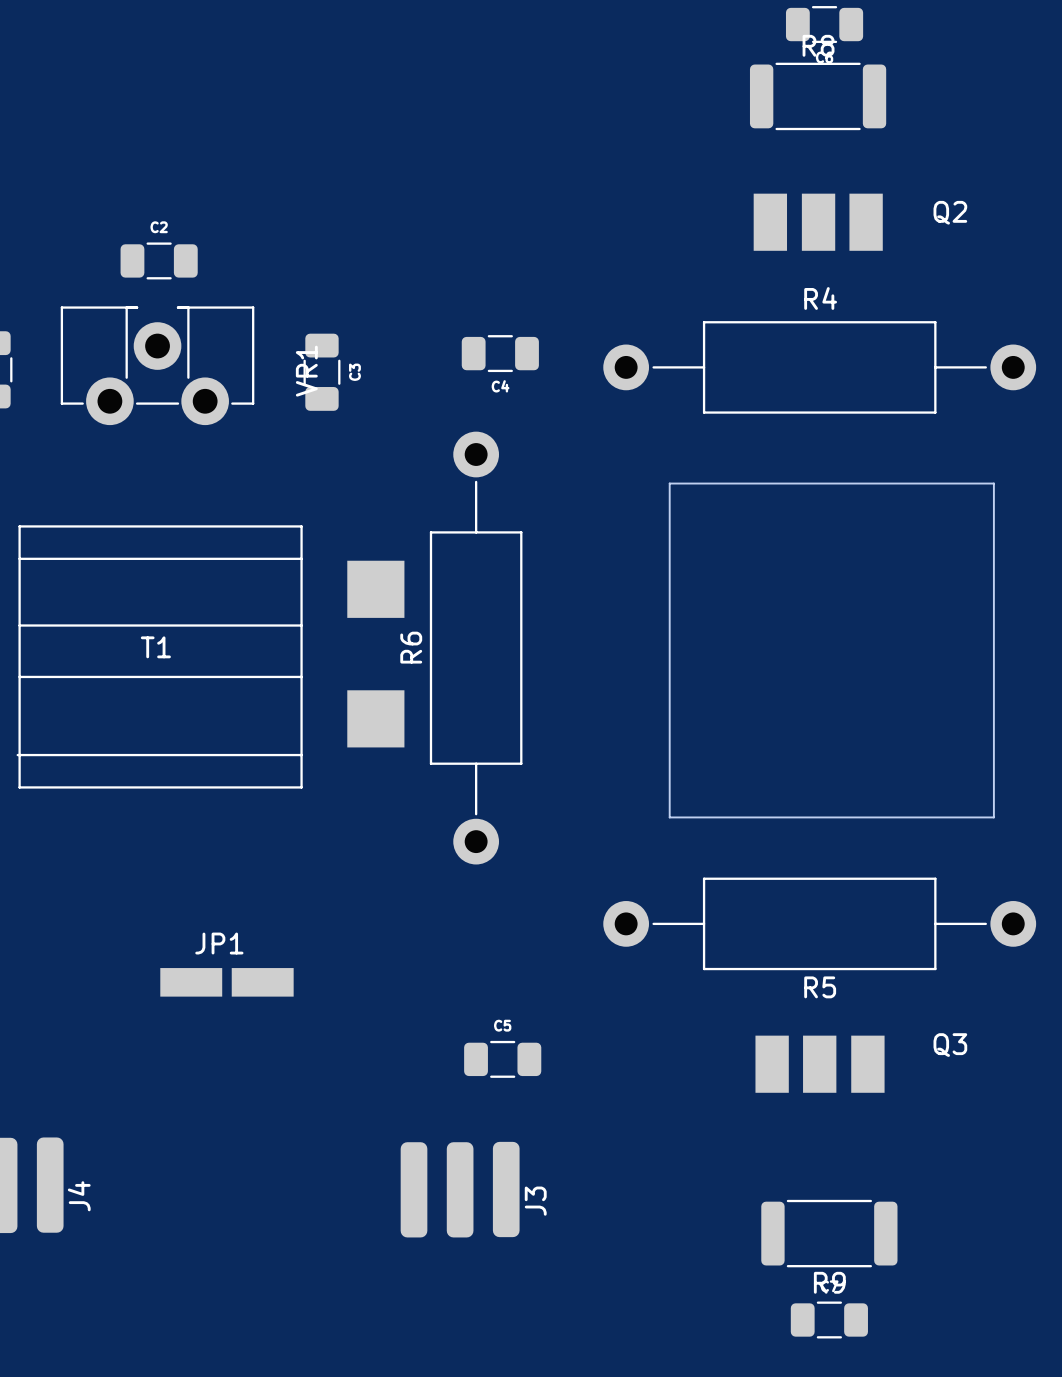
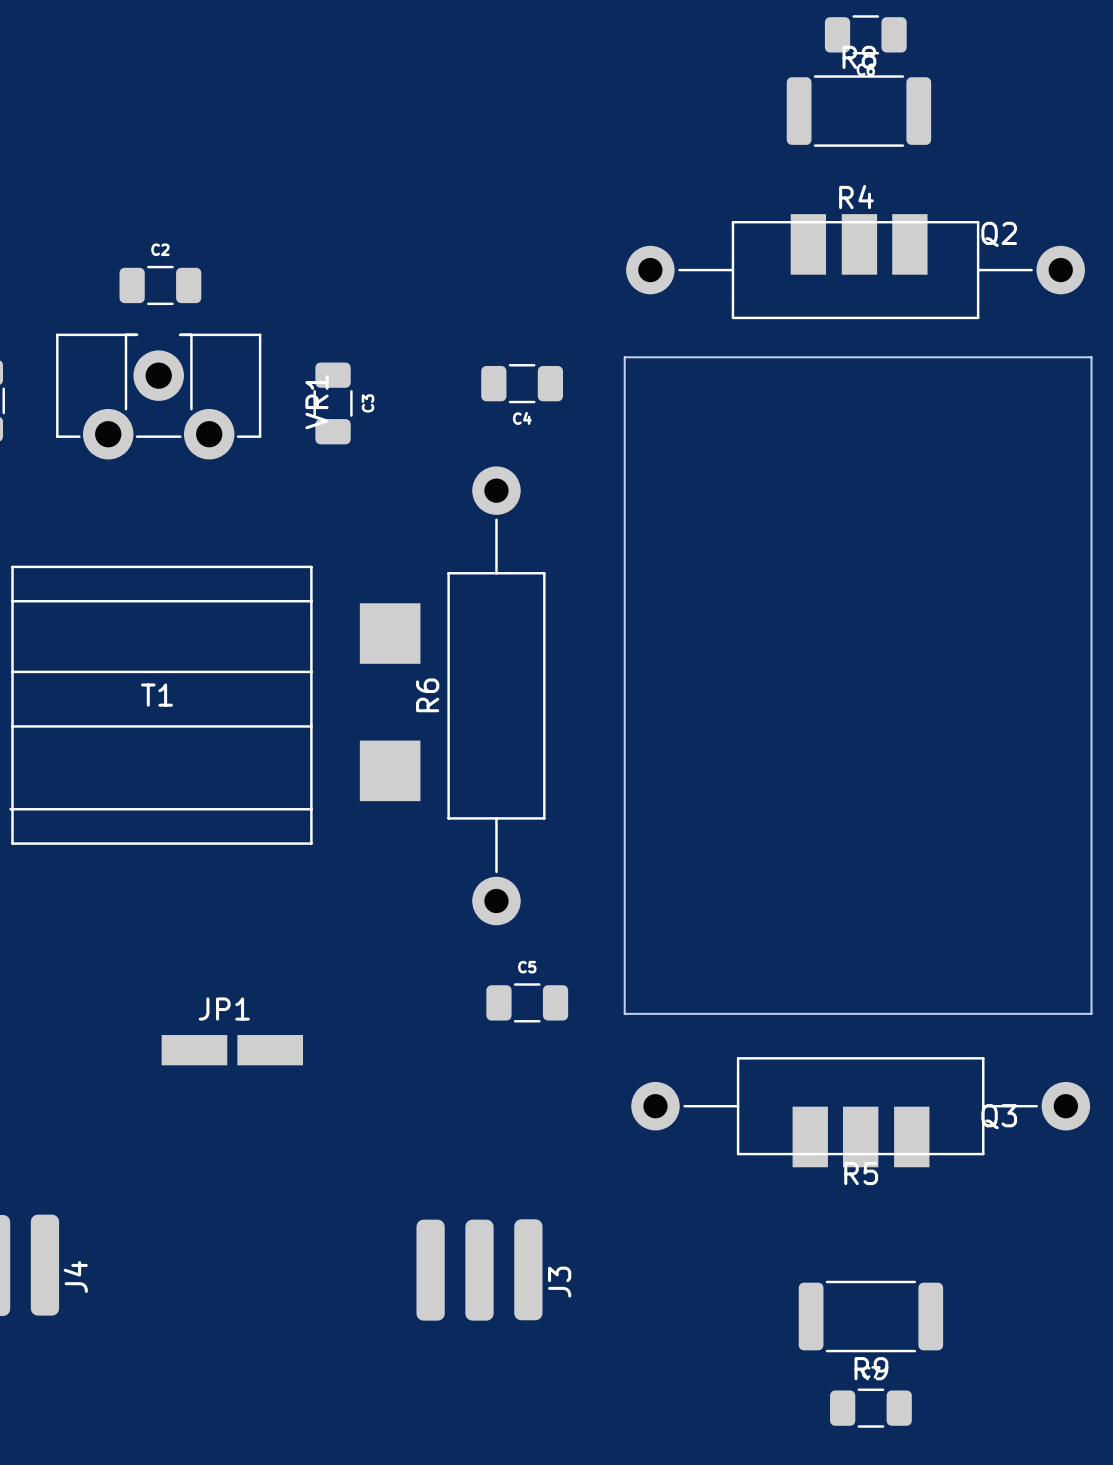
board edge: none -> (624, 357) (1091, 357) (1091, 1013) (624, 1013) (624, 357)
R4 position: (819, 367) -> (855, 270)
board edge: (669, 483) (993, 483) (993, 817) (669, 817) (669, 483) -> none
R5 position: (819, 923) -> (860, 1106)
C5 position: (502, 1059) -> (527, 1002)

